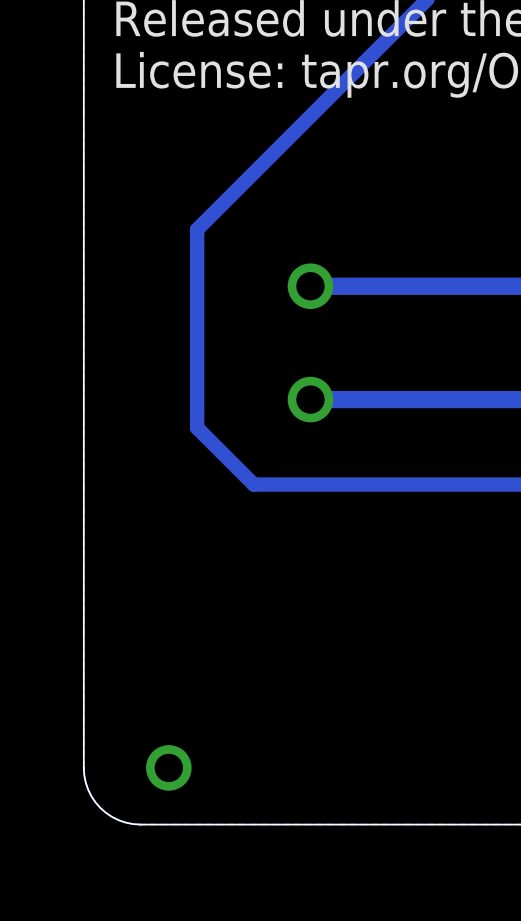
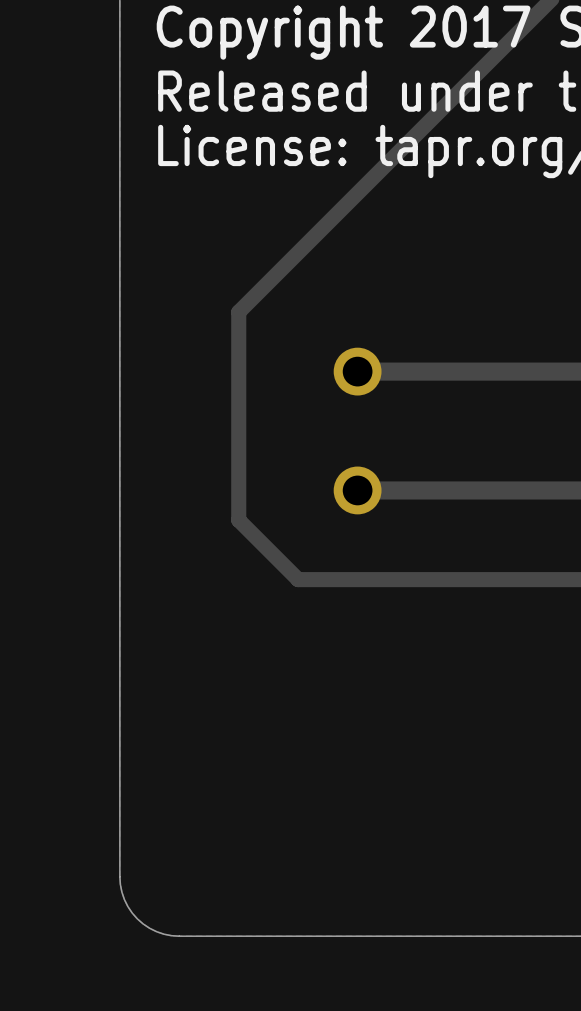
via: (168, 767) -> none

